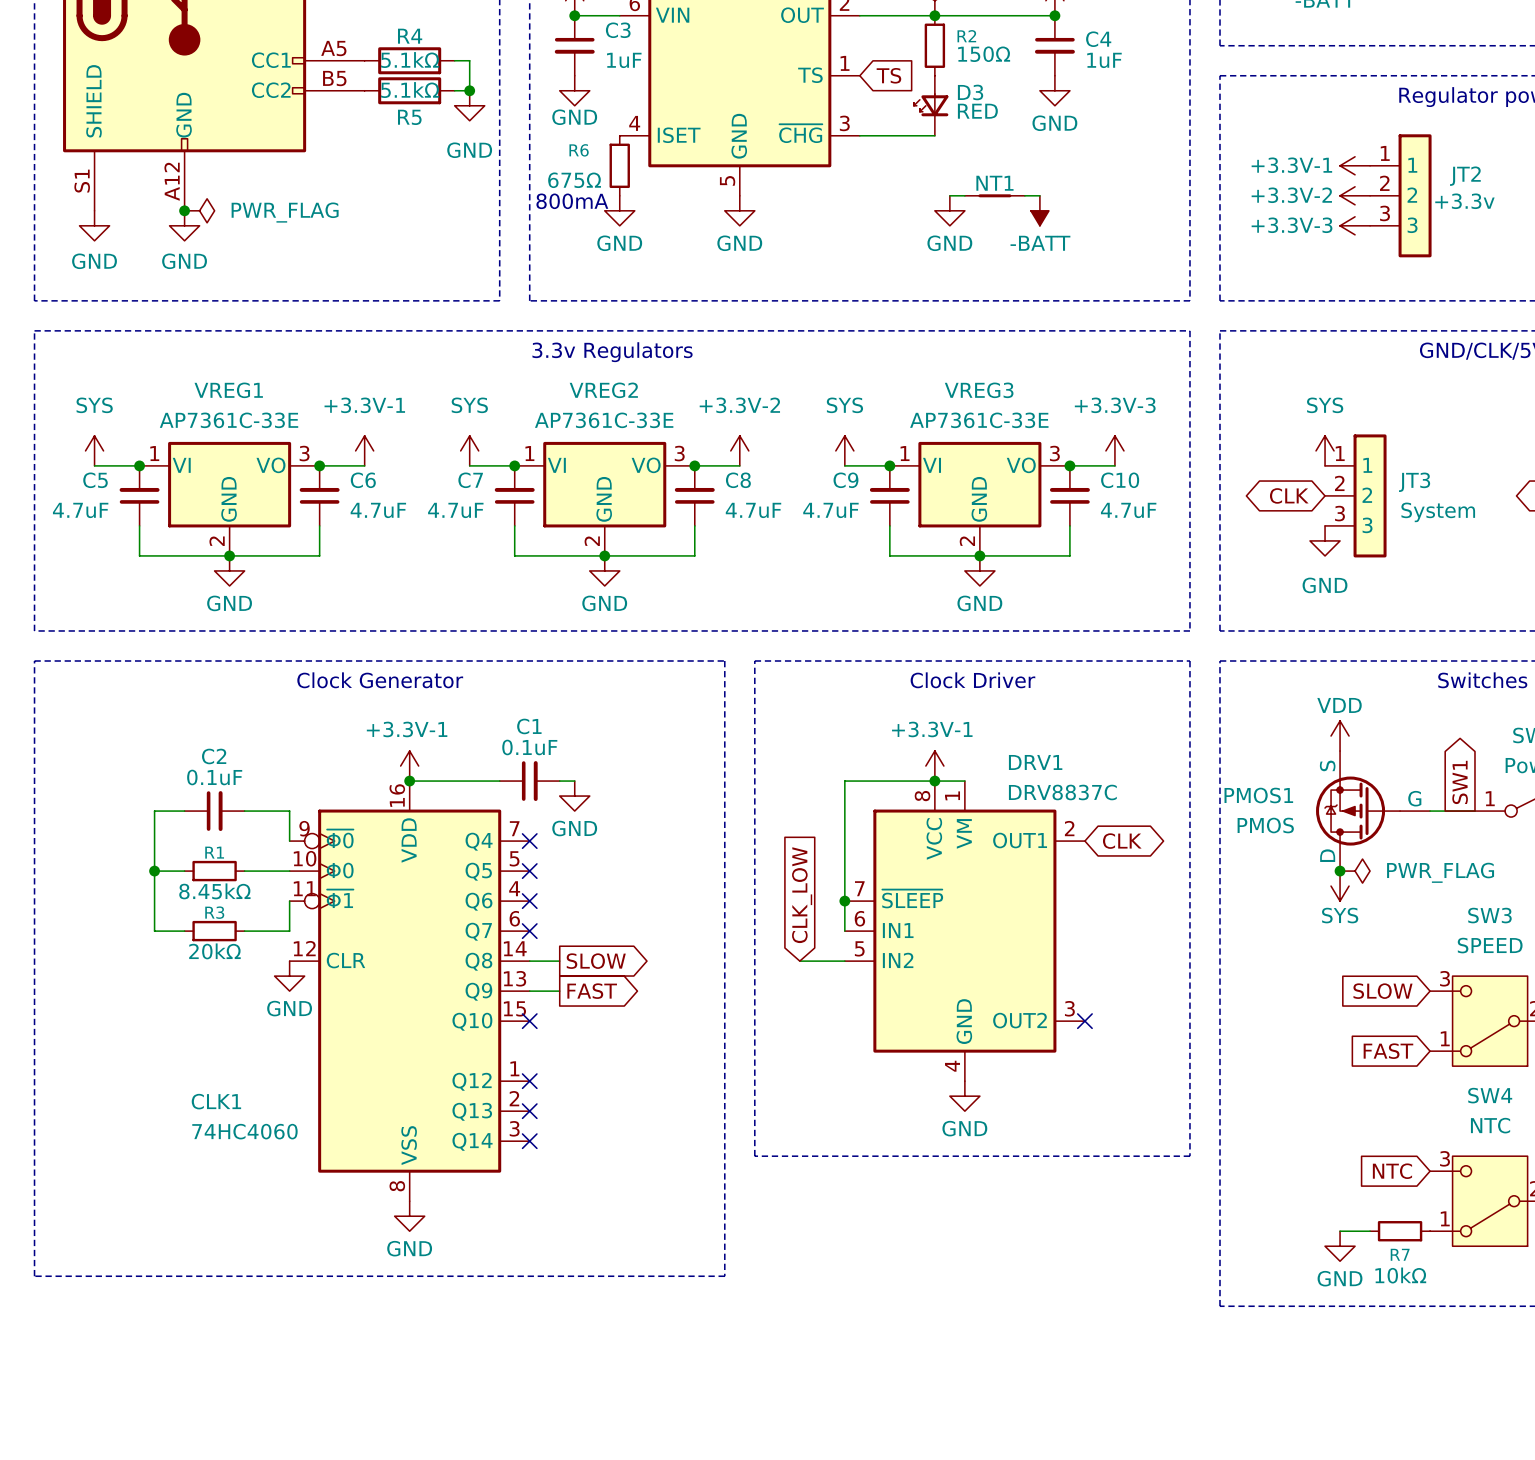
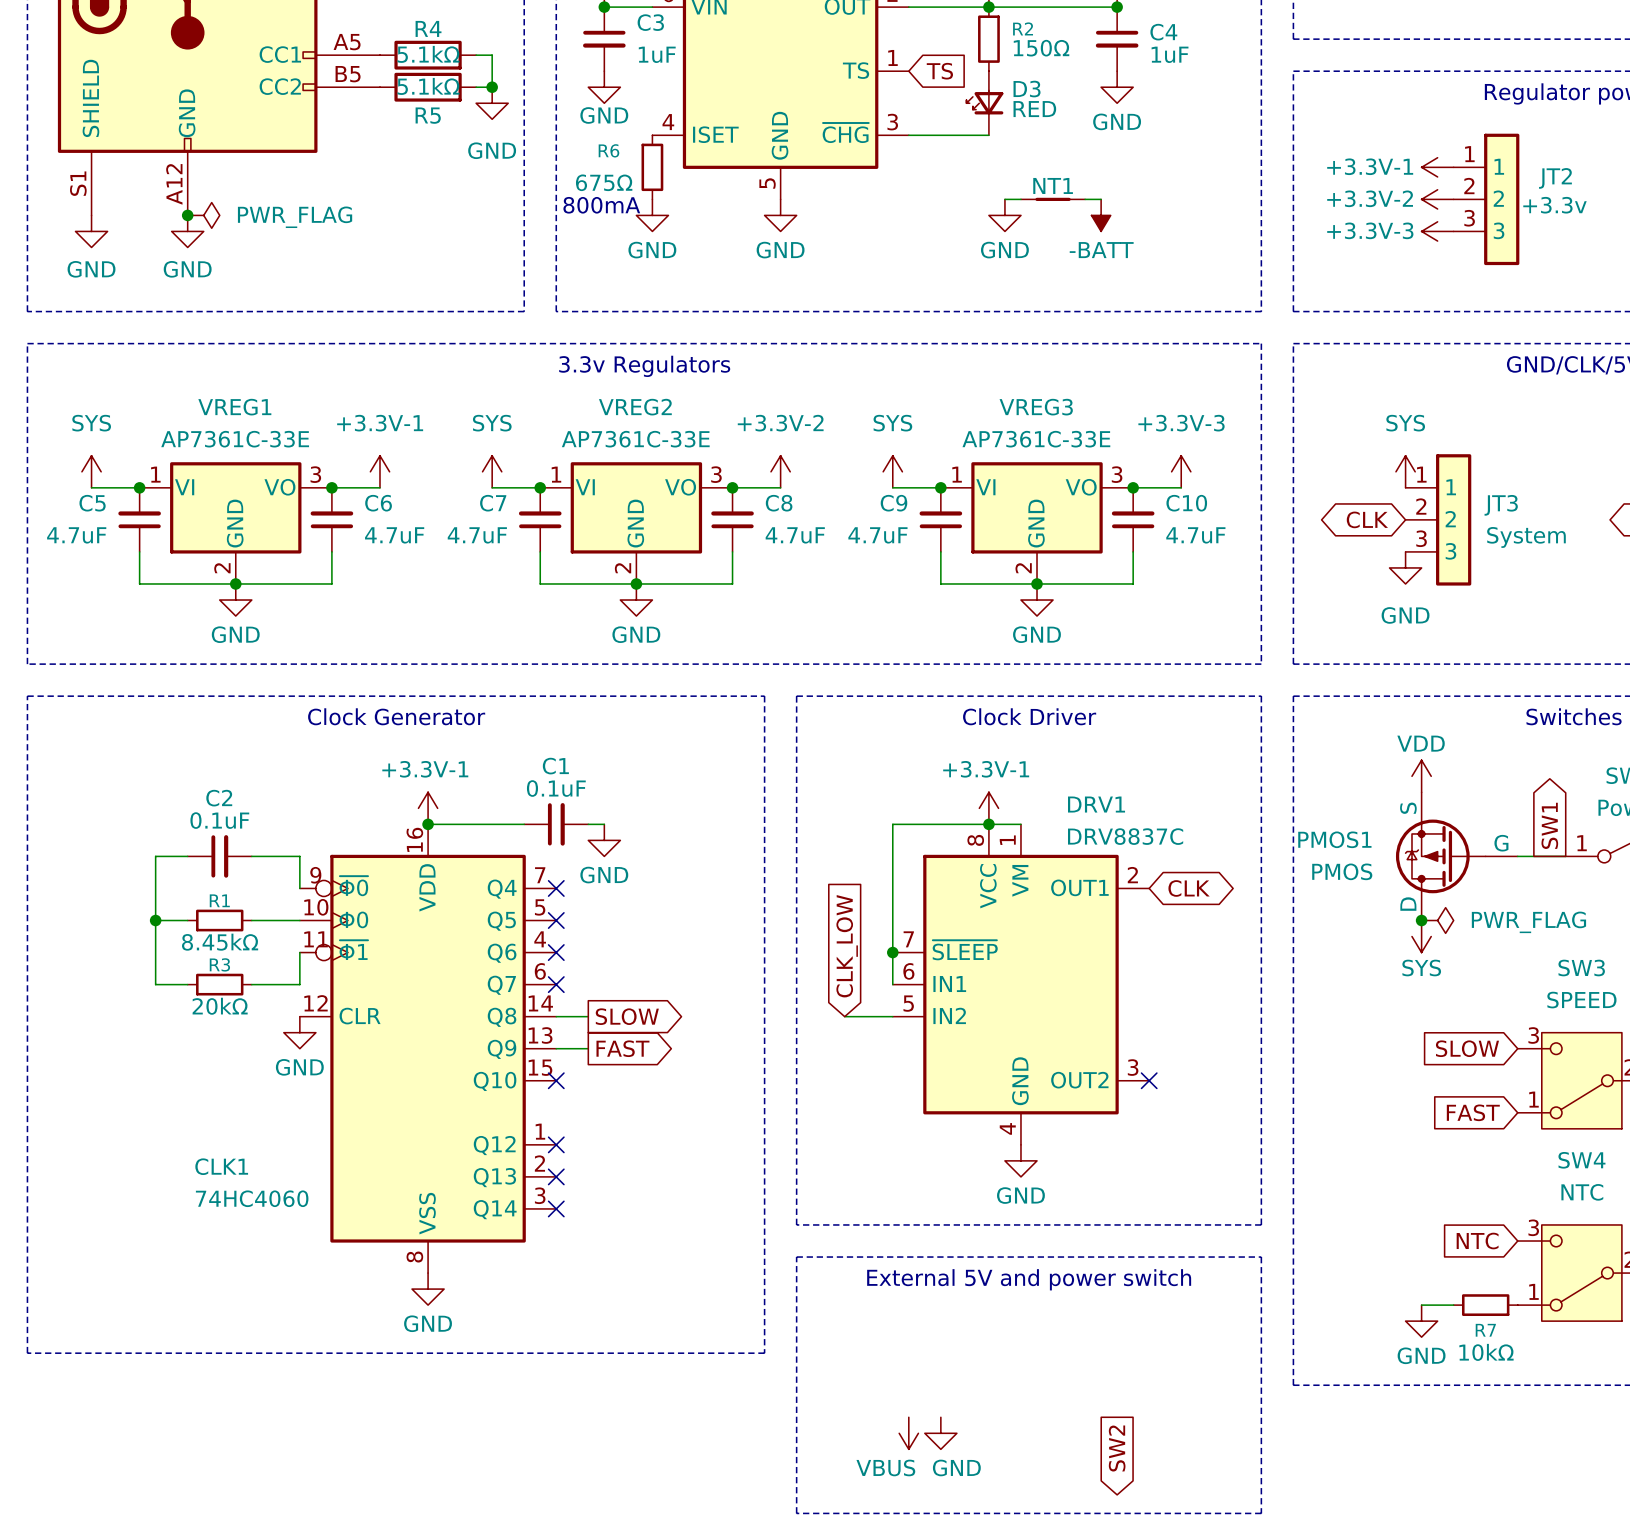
line: none -> (796, 1257) (1261, 1257) (1261, 1513) (796, 1513) (796, 1257)
text: none -> External 5V and power switch (1029, 1279)
power symbol: none -> VBUS (908, 1433)
power symbol: none -> GND (940, 1433)
global label: none -> SW2 (1117, 1448)

